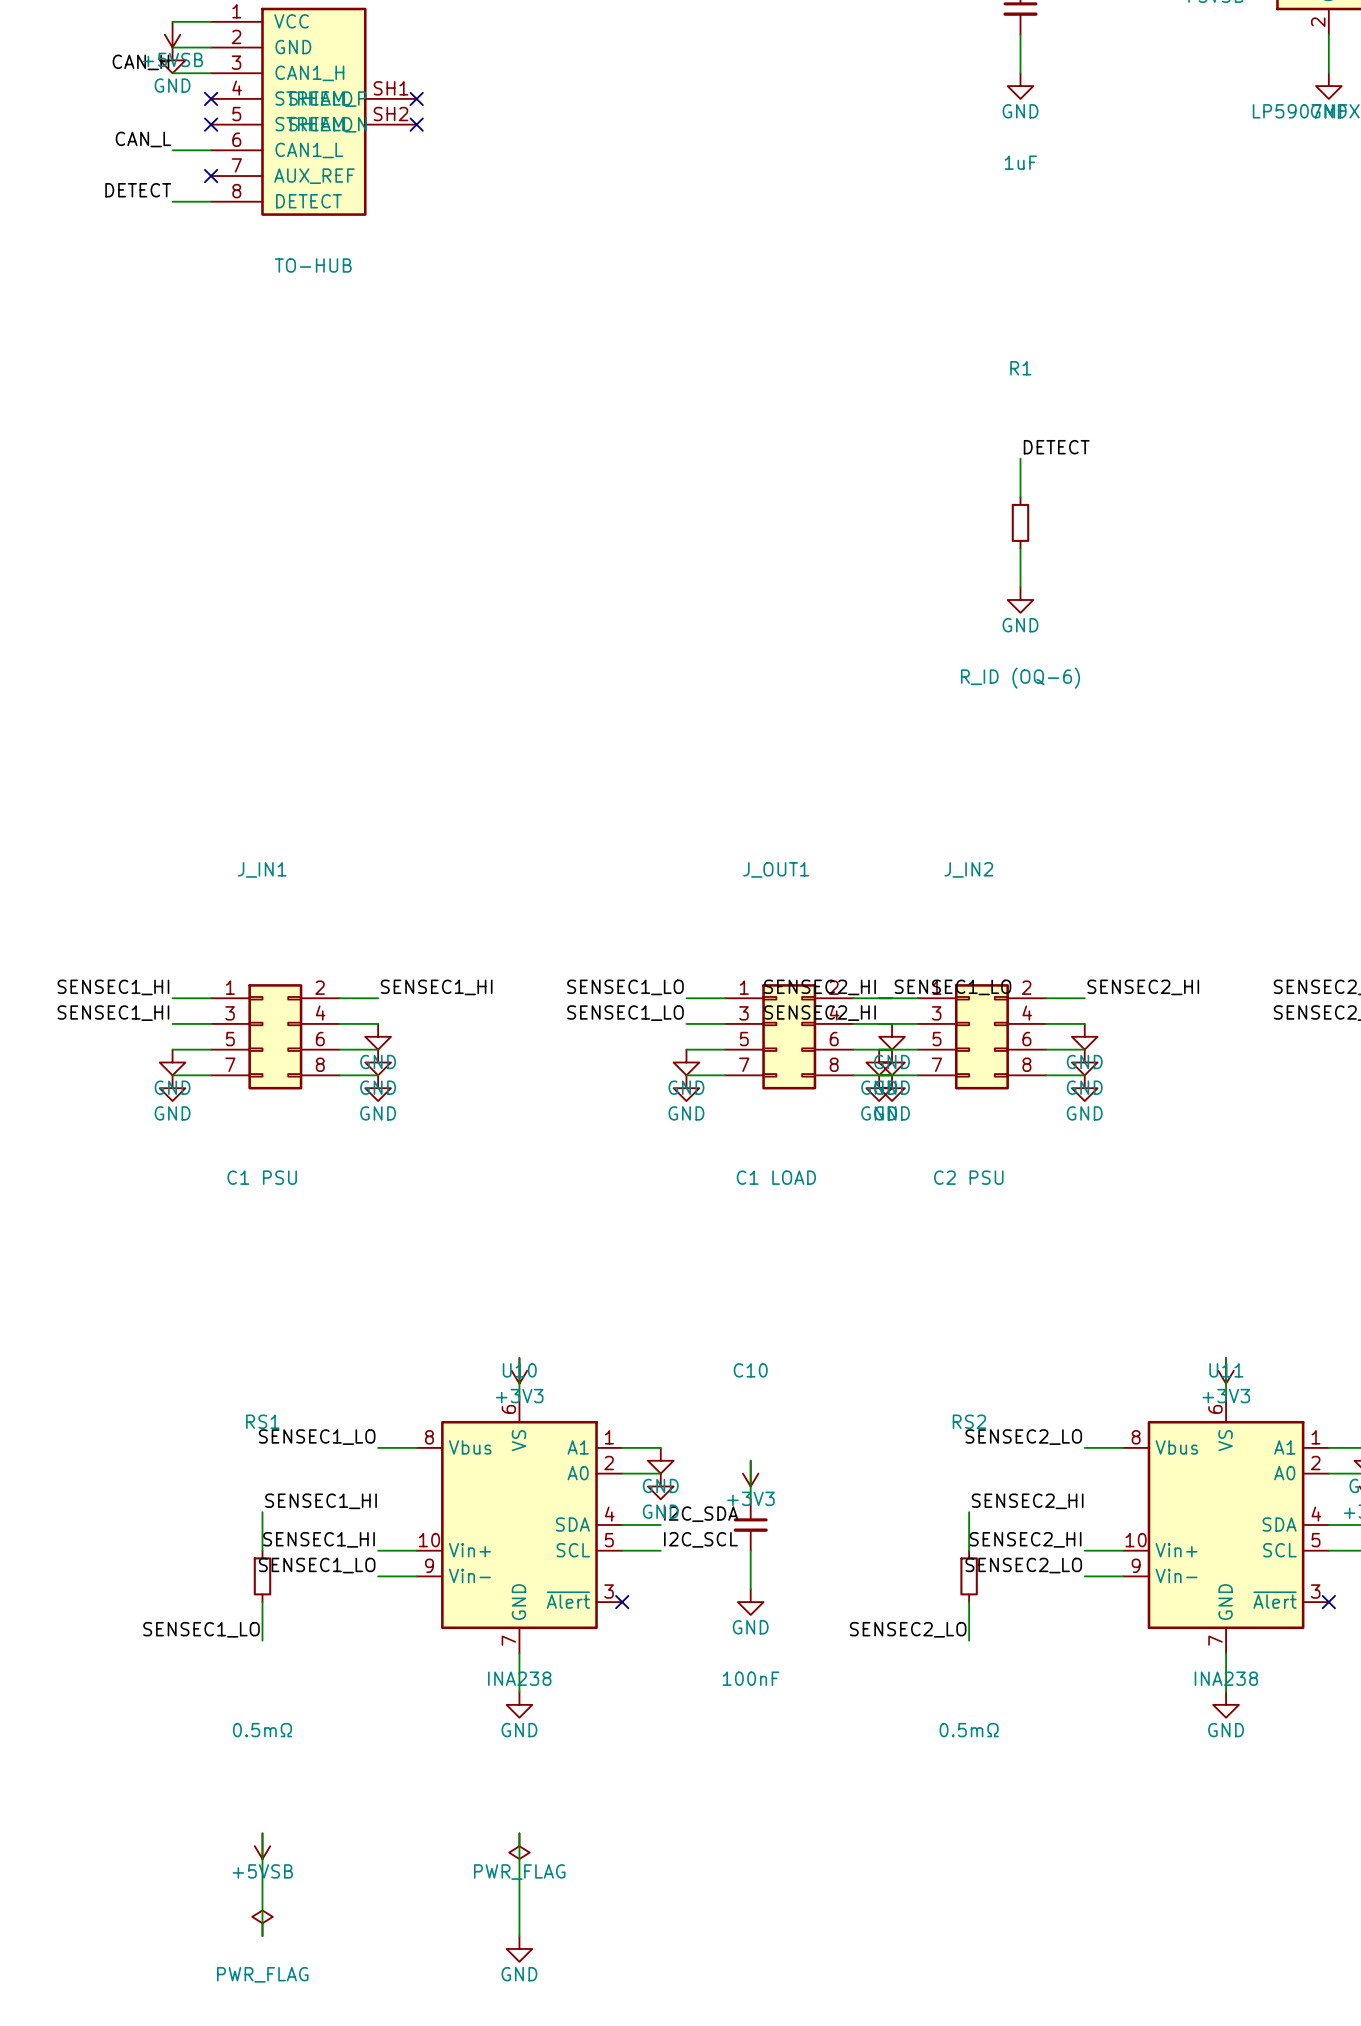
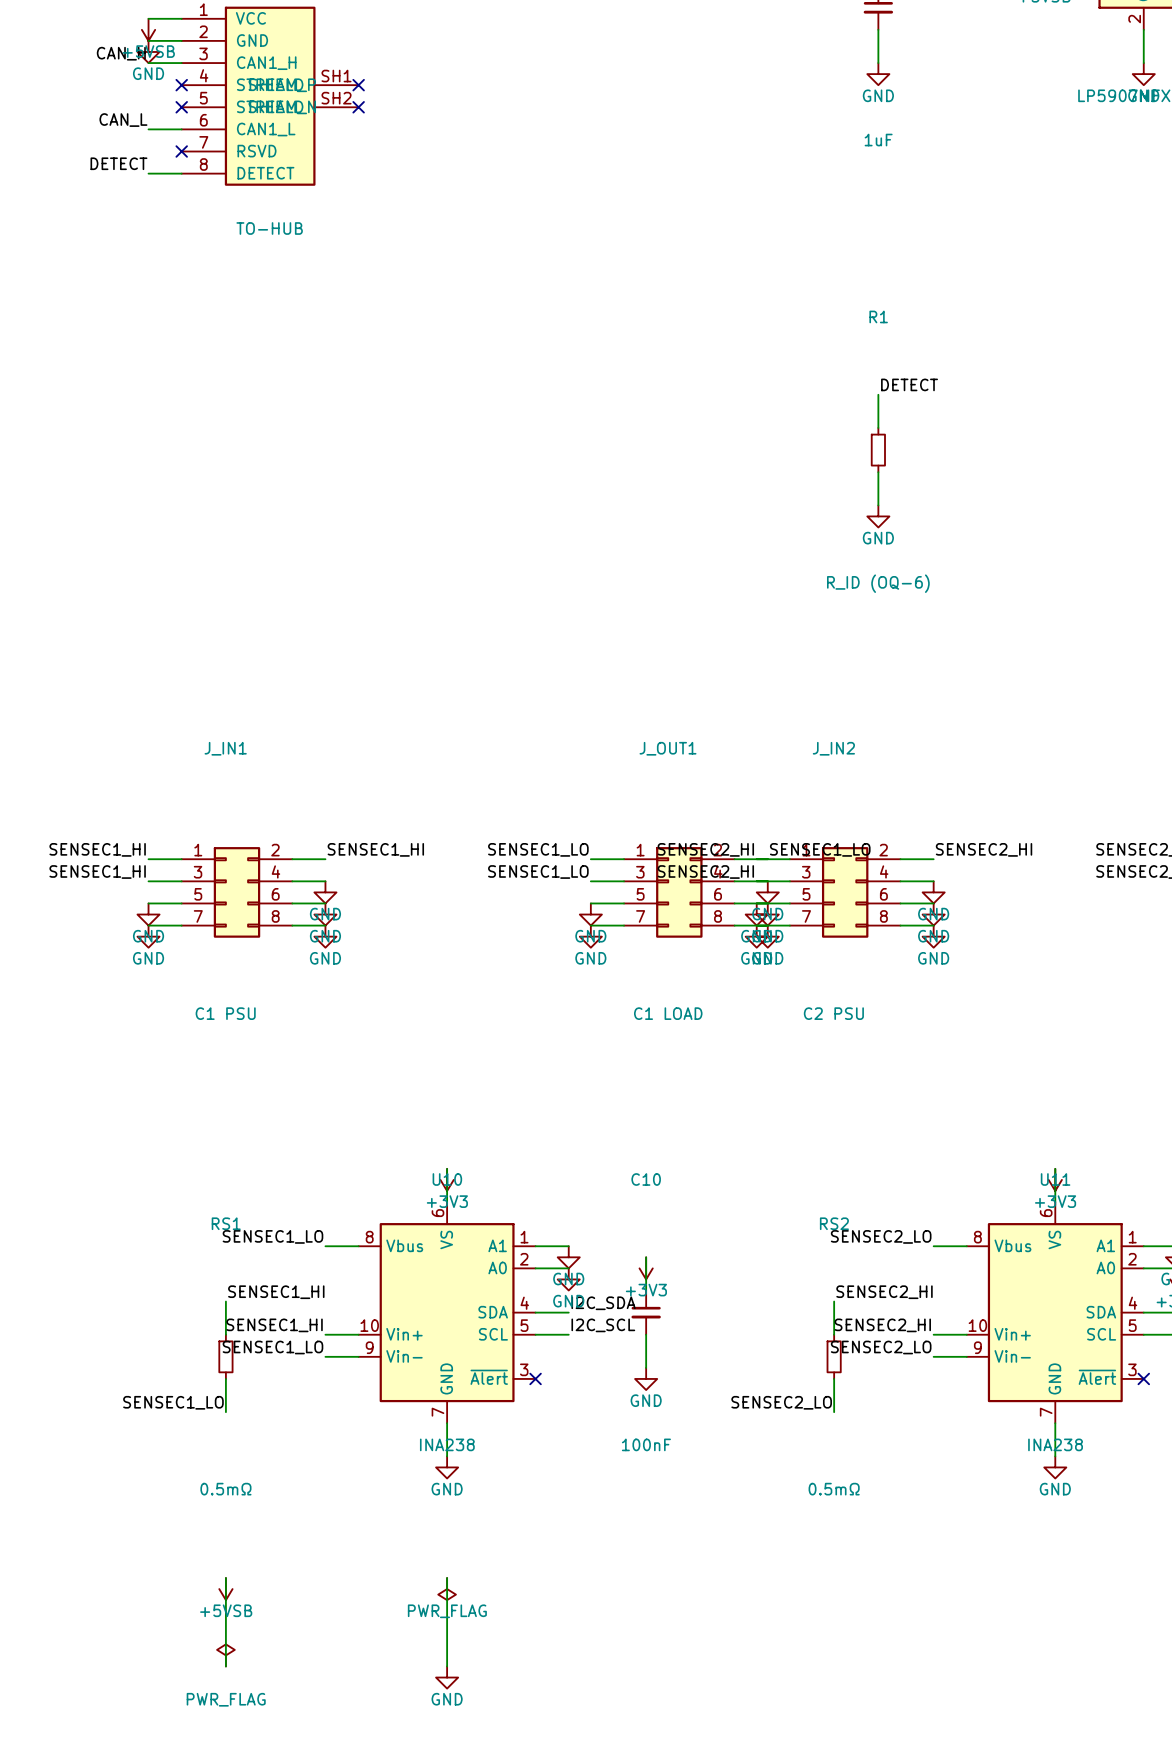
part pin name: AUX_REF (314, 176) -> RSVD (256, 151)

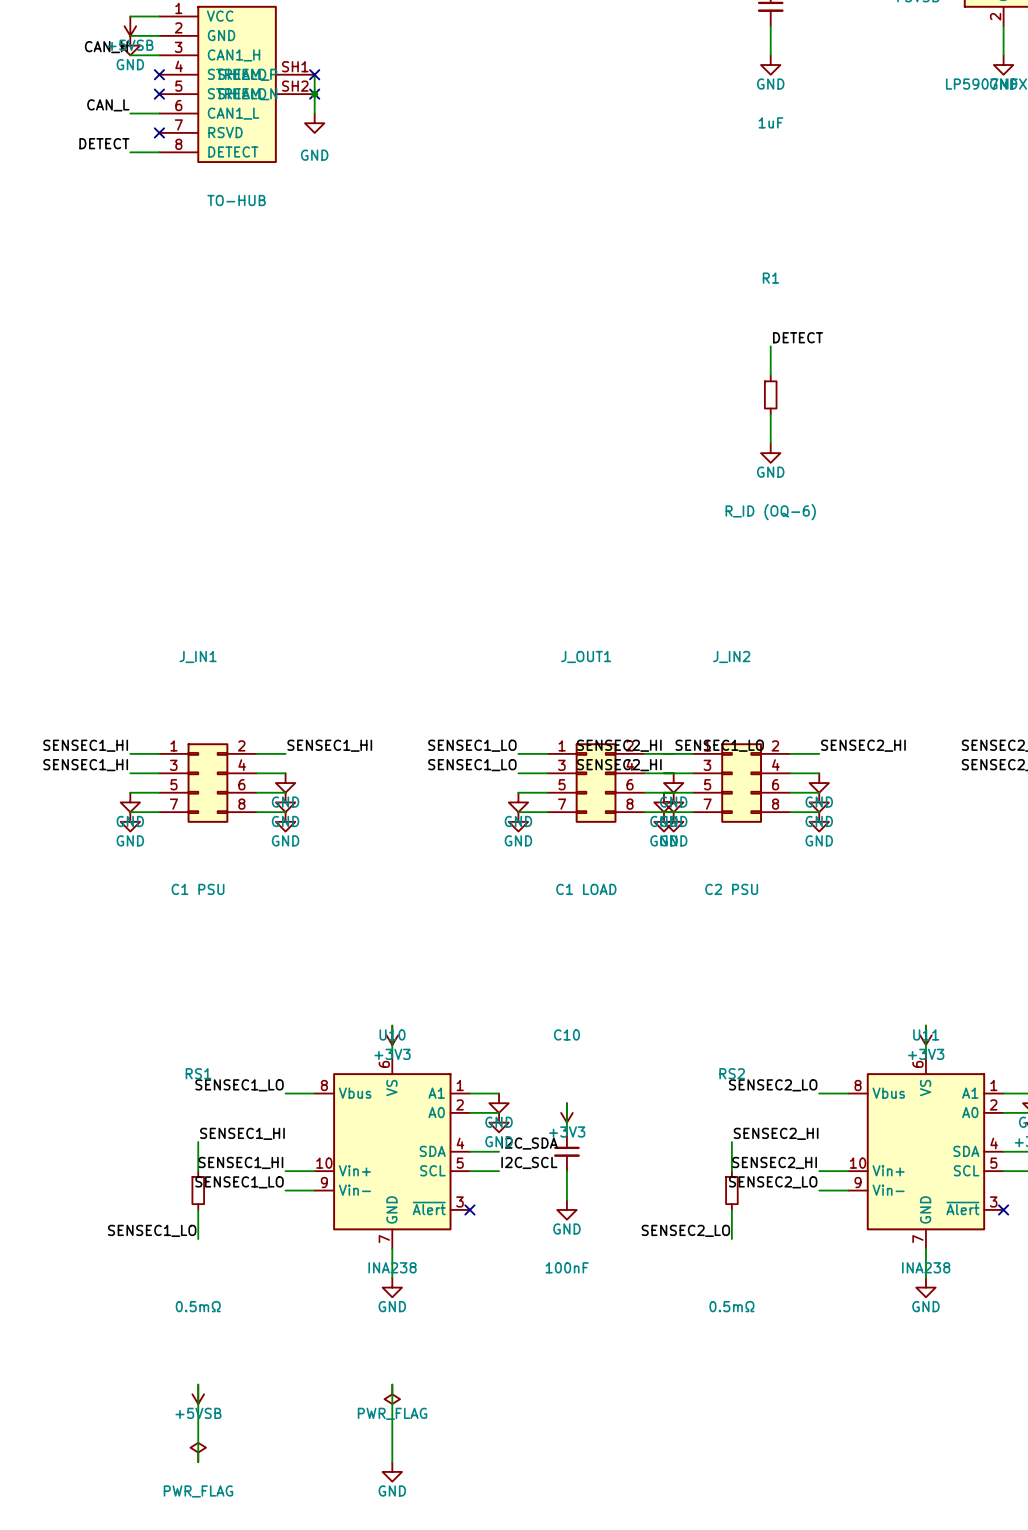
wire: none -> (314, 74) (314, 113)
junction: none -> (314, 94)
power symbol: none -> GND (314, 123)

